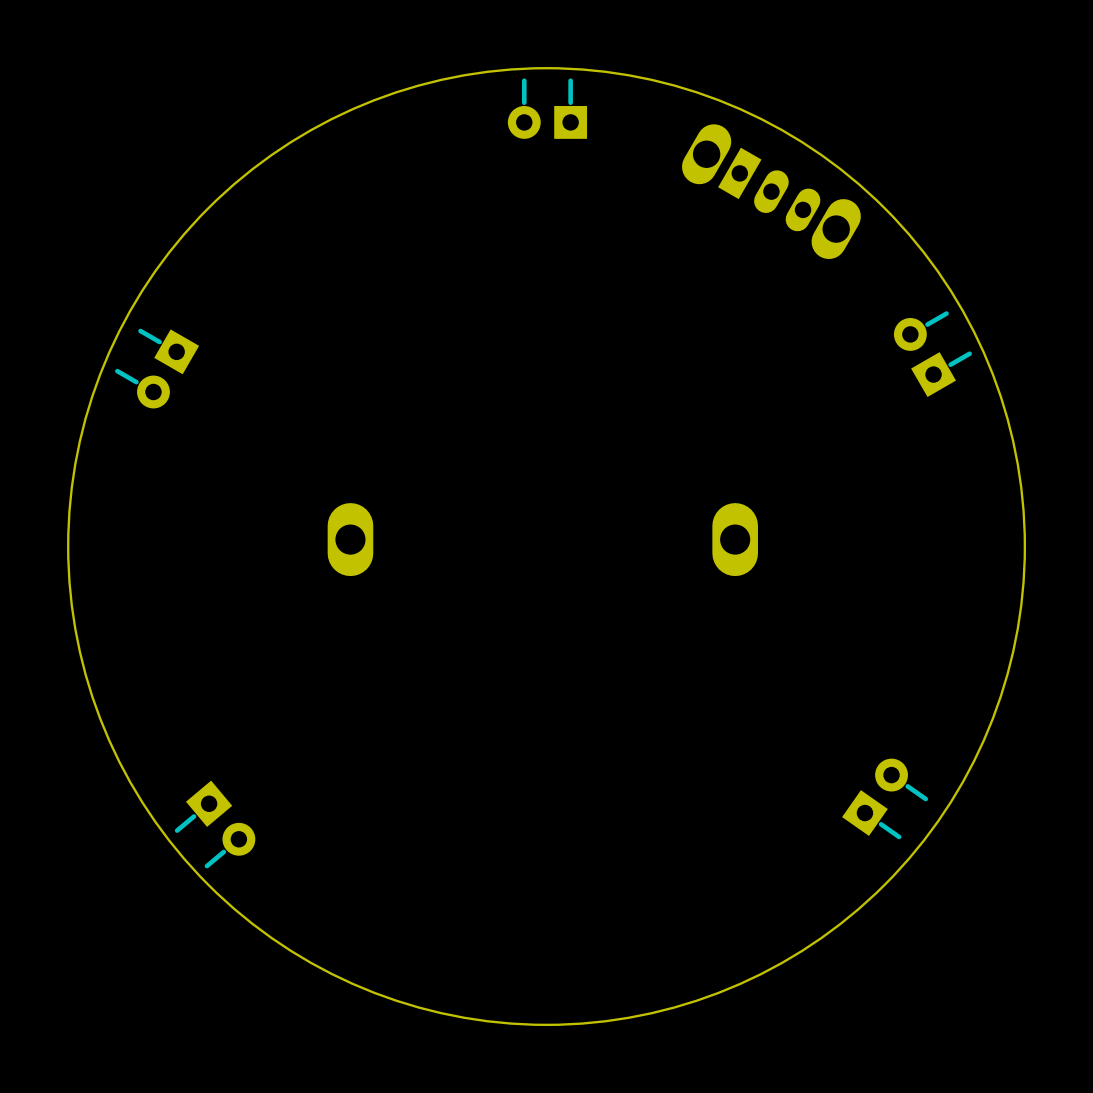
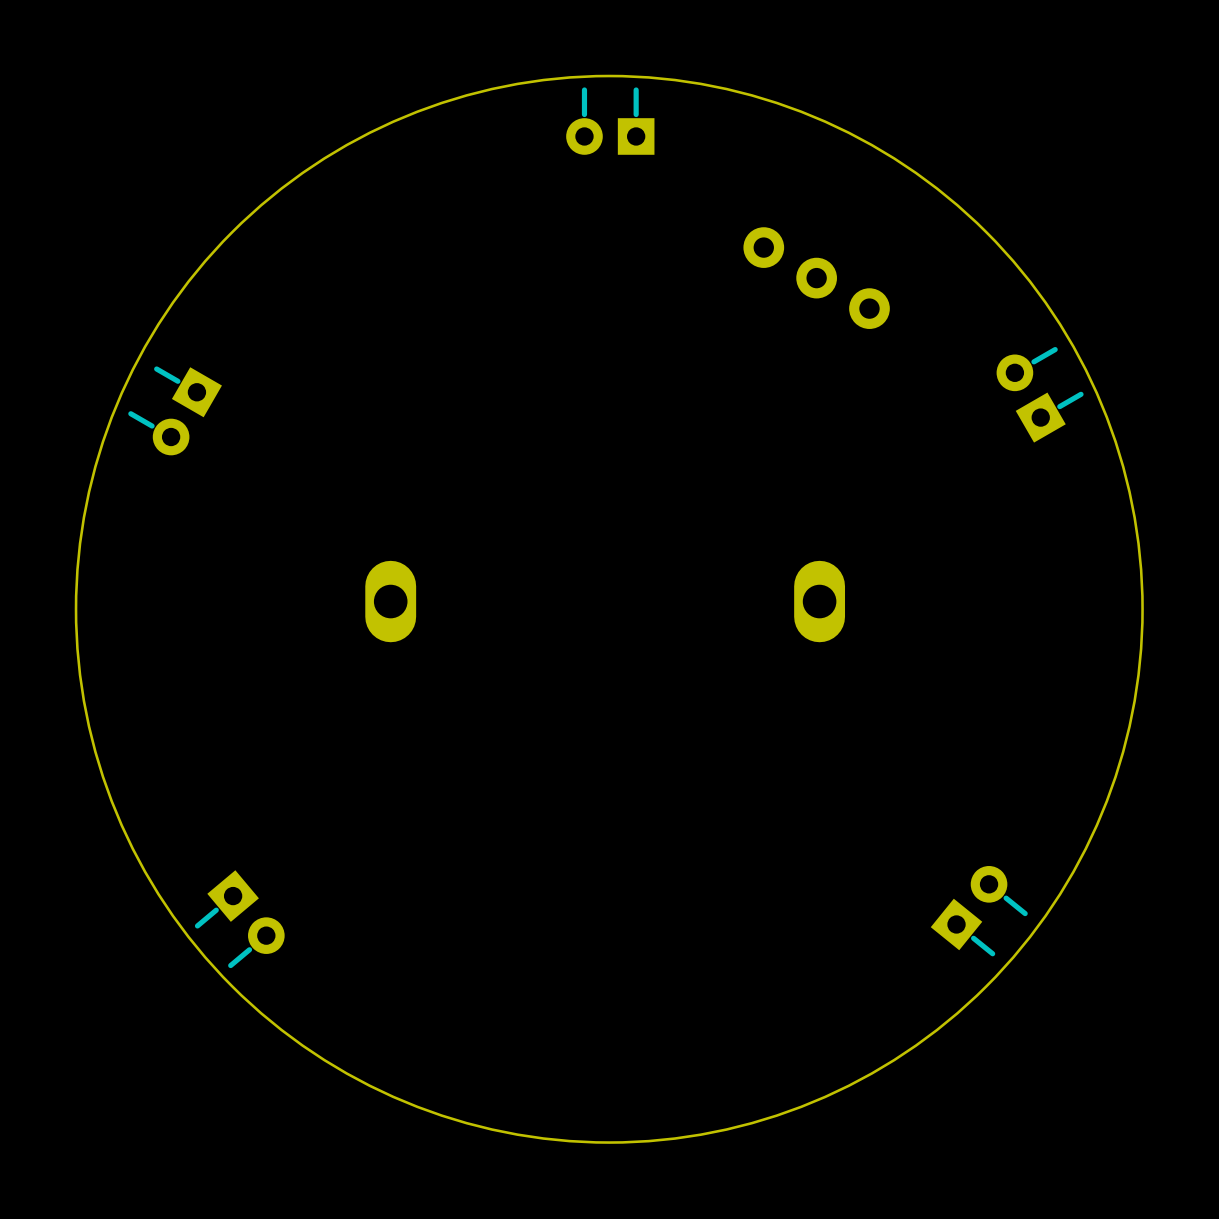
part: (771, 191) -> none
part: none -> (816, 278)
part: (885, 798) -> none
part: none -> (979, 911)

